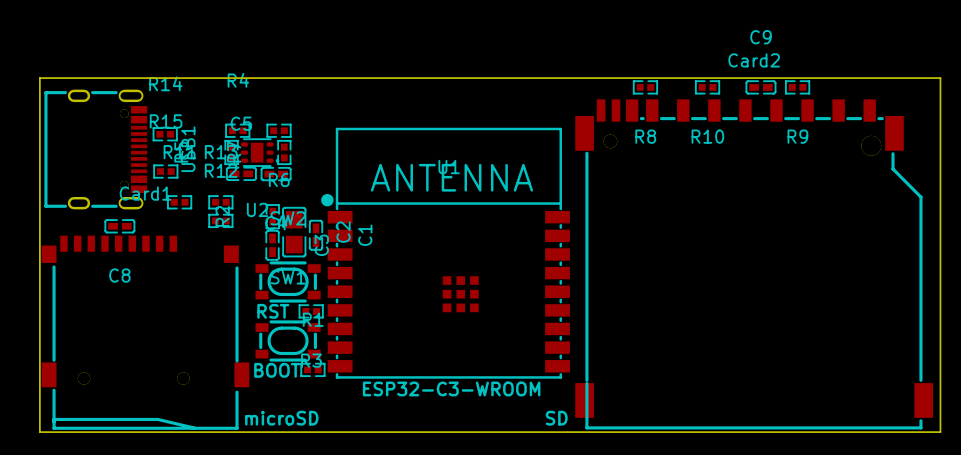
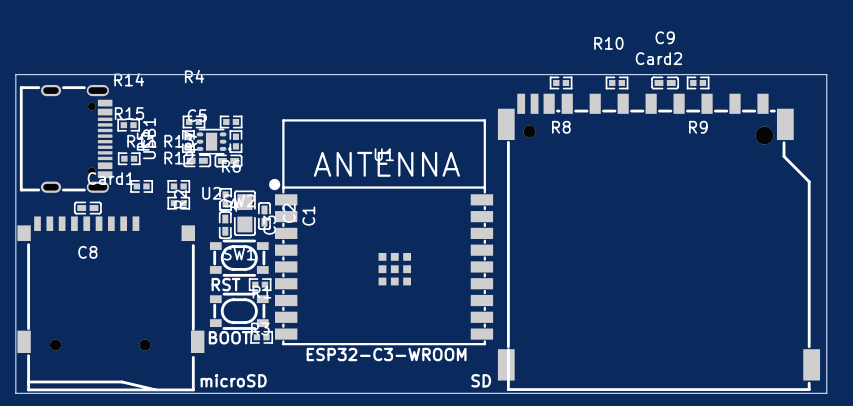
R10 name position: R10 (707, 136) -> R10 (608, 43)

